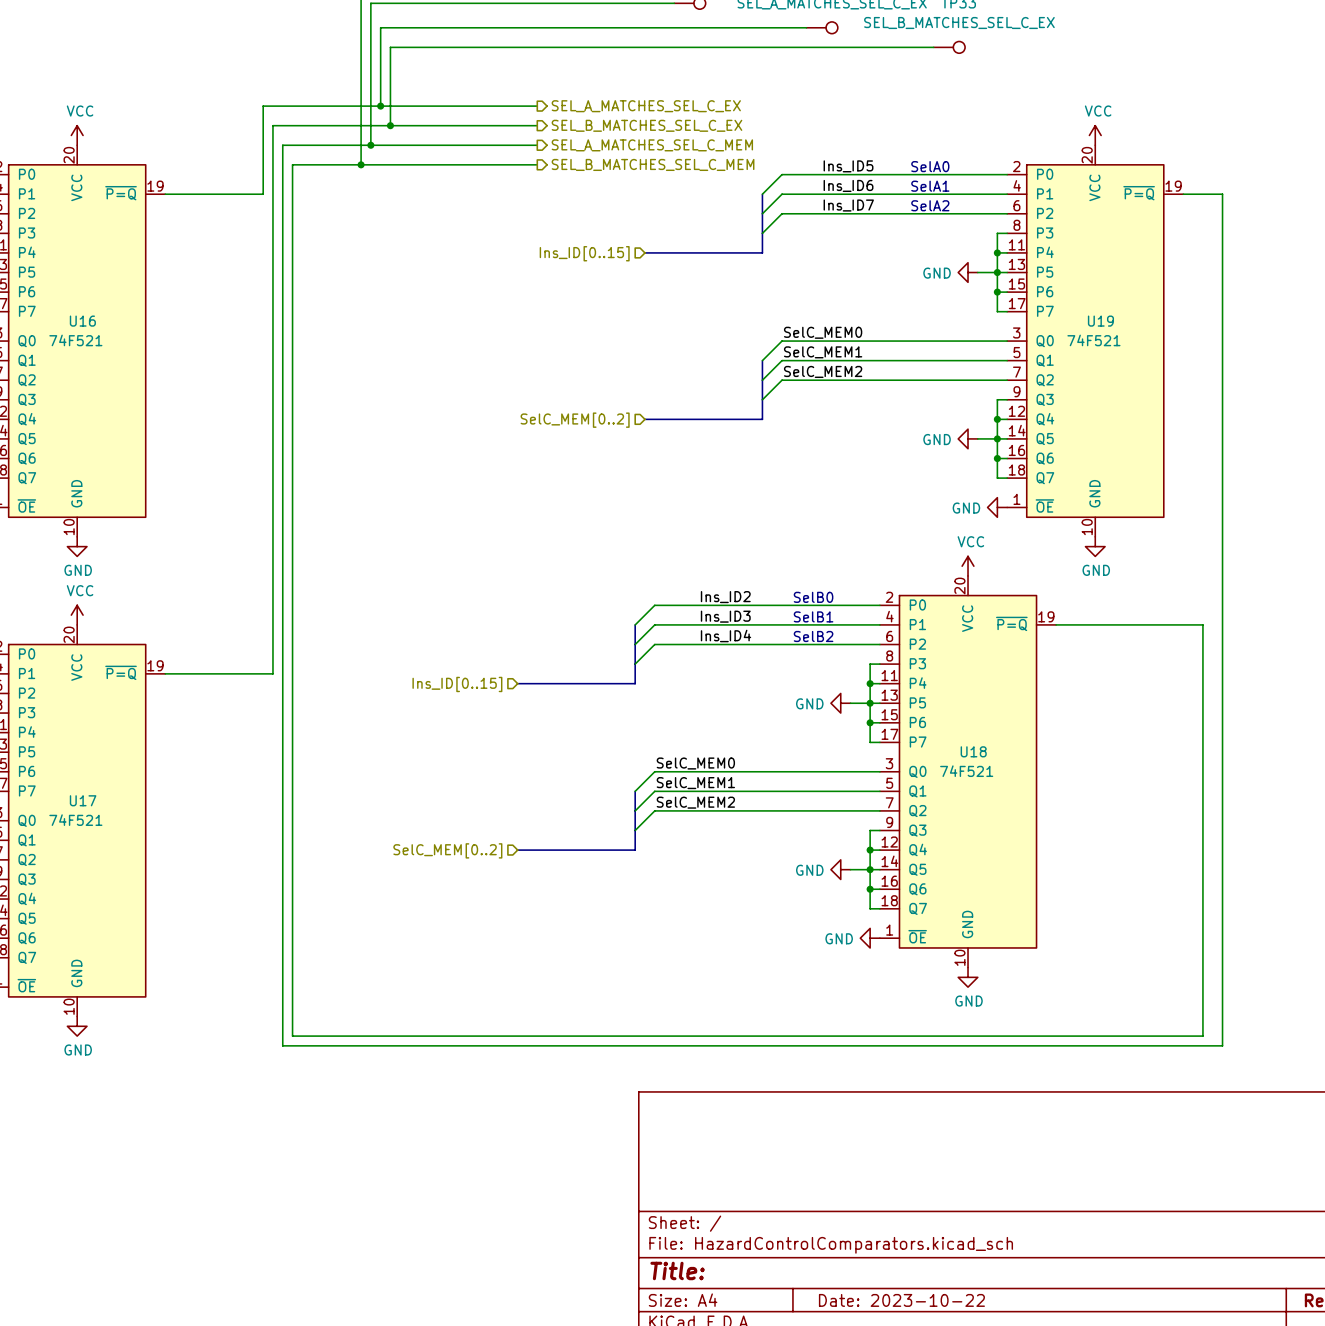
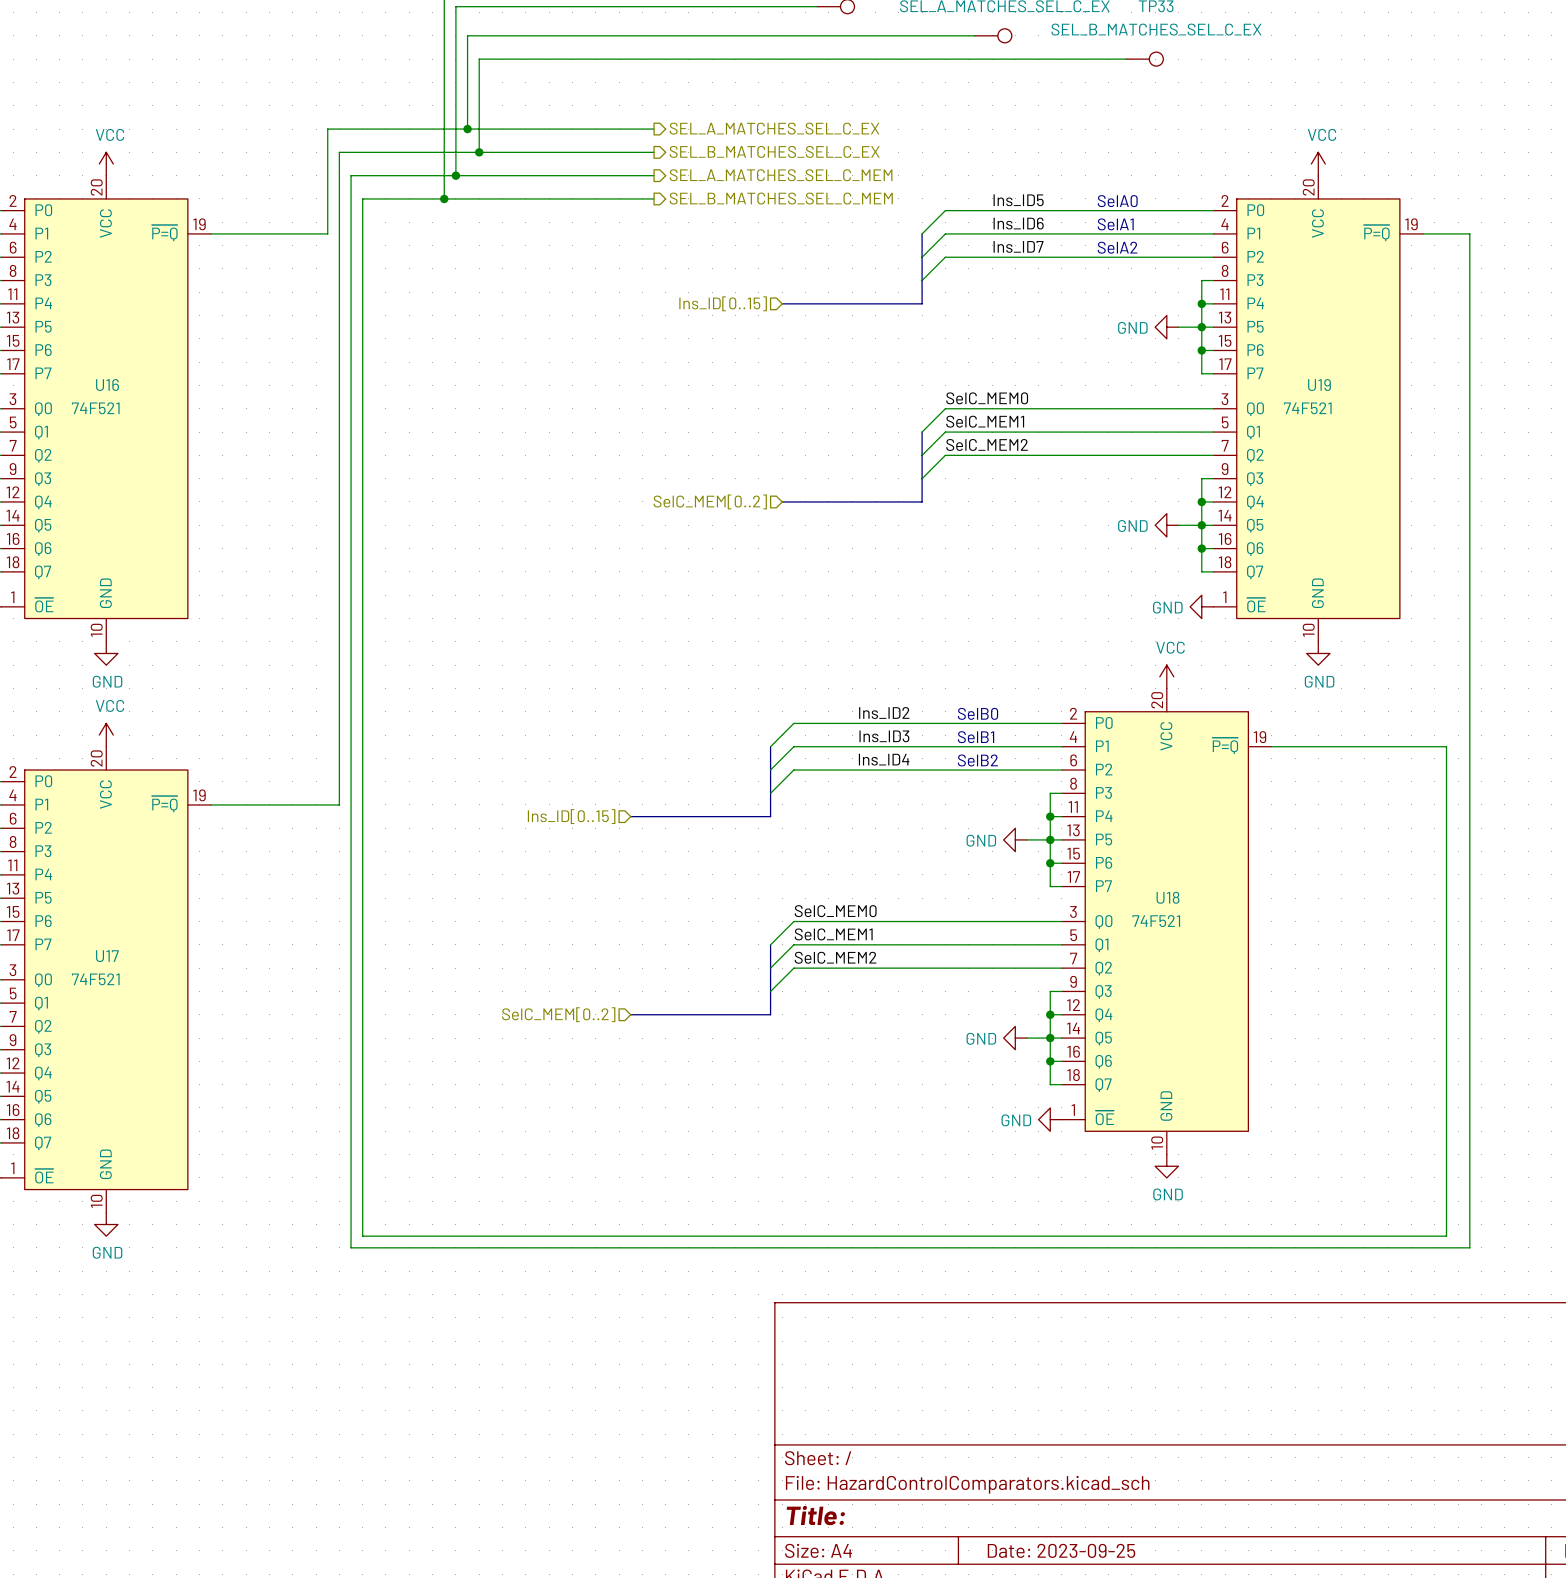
title block: Date: 2023-10-22 (901, 1300) -> Date: 2023-09-25 (1061, 1550)

